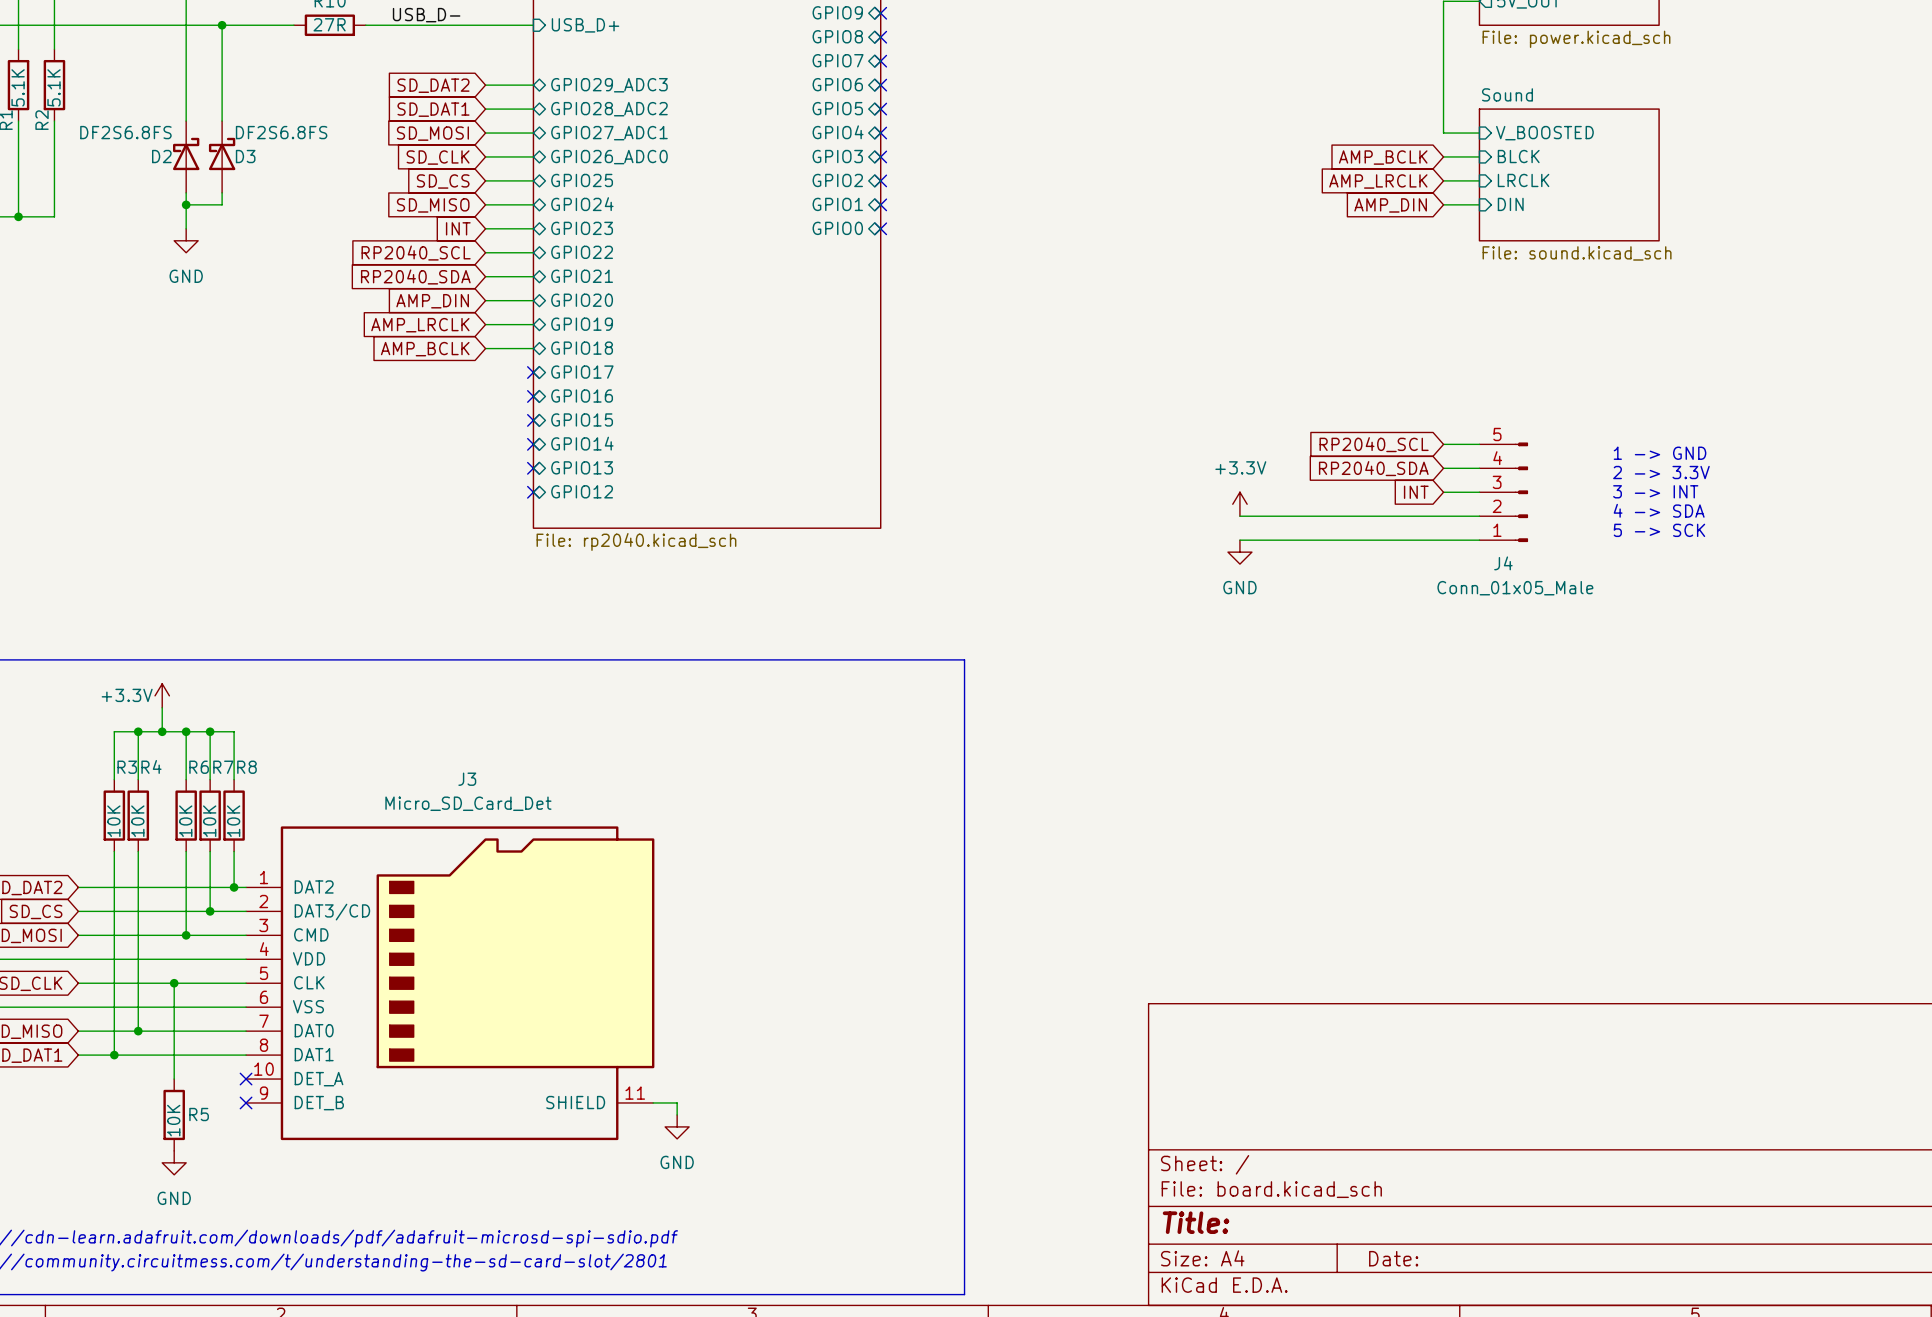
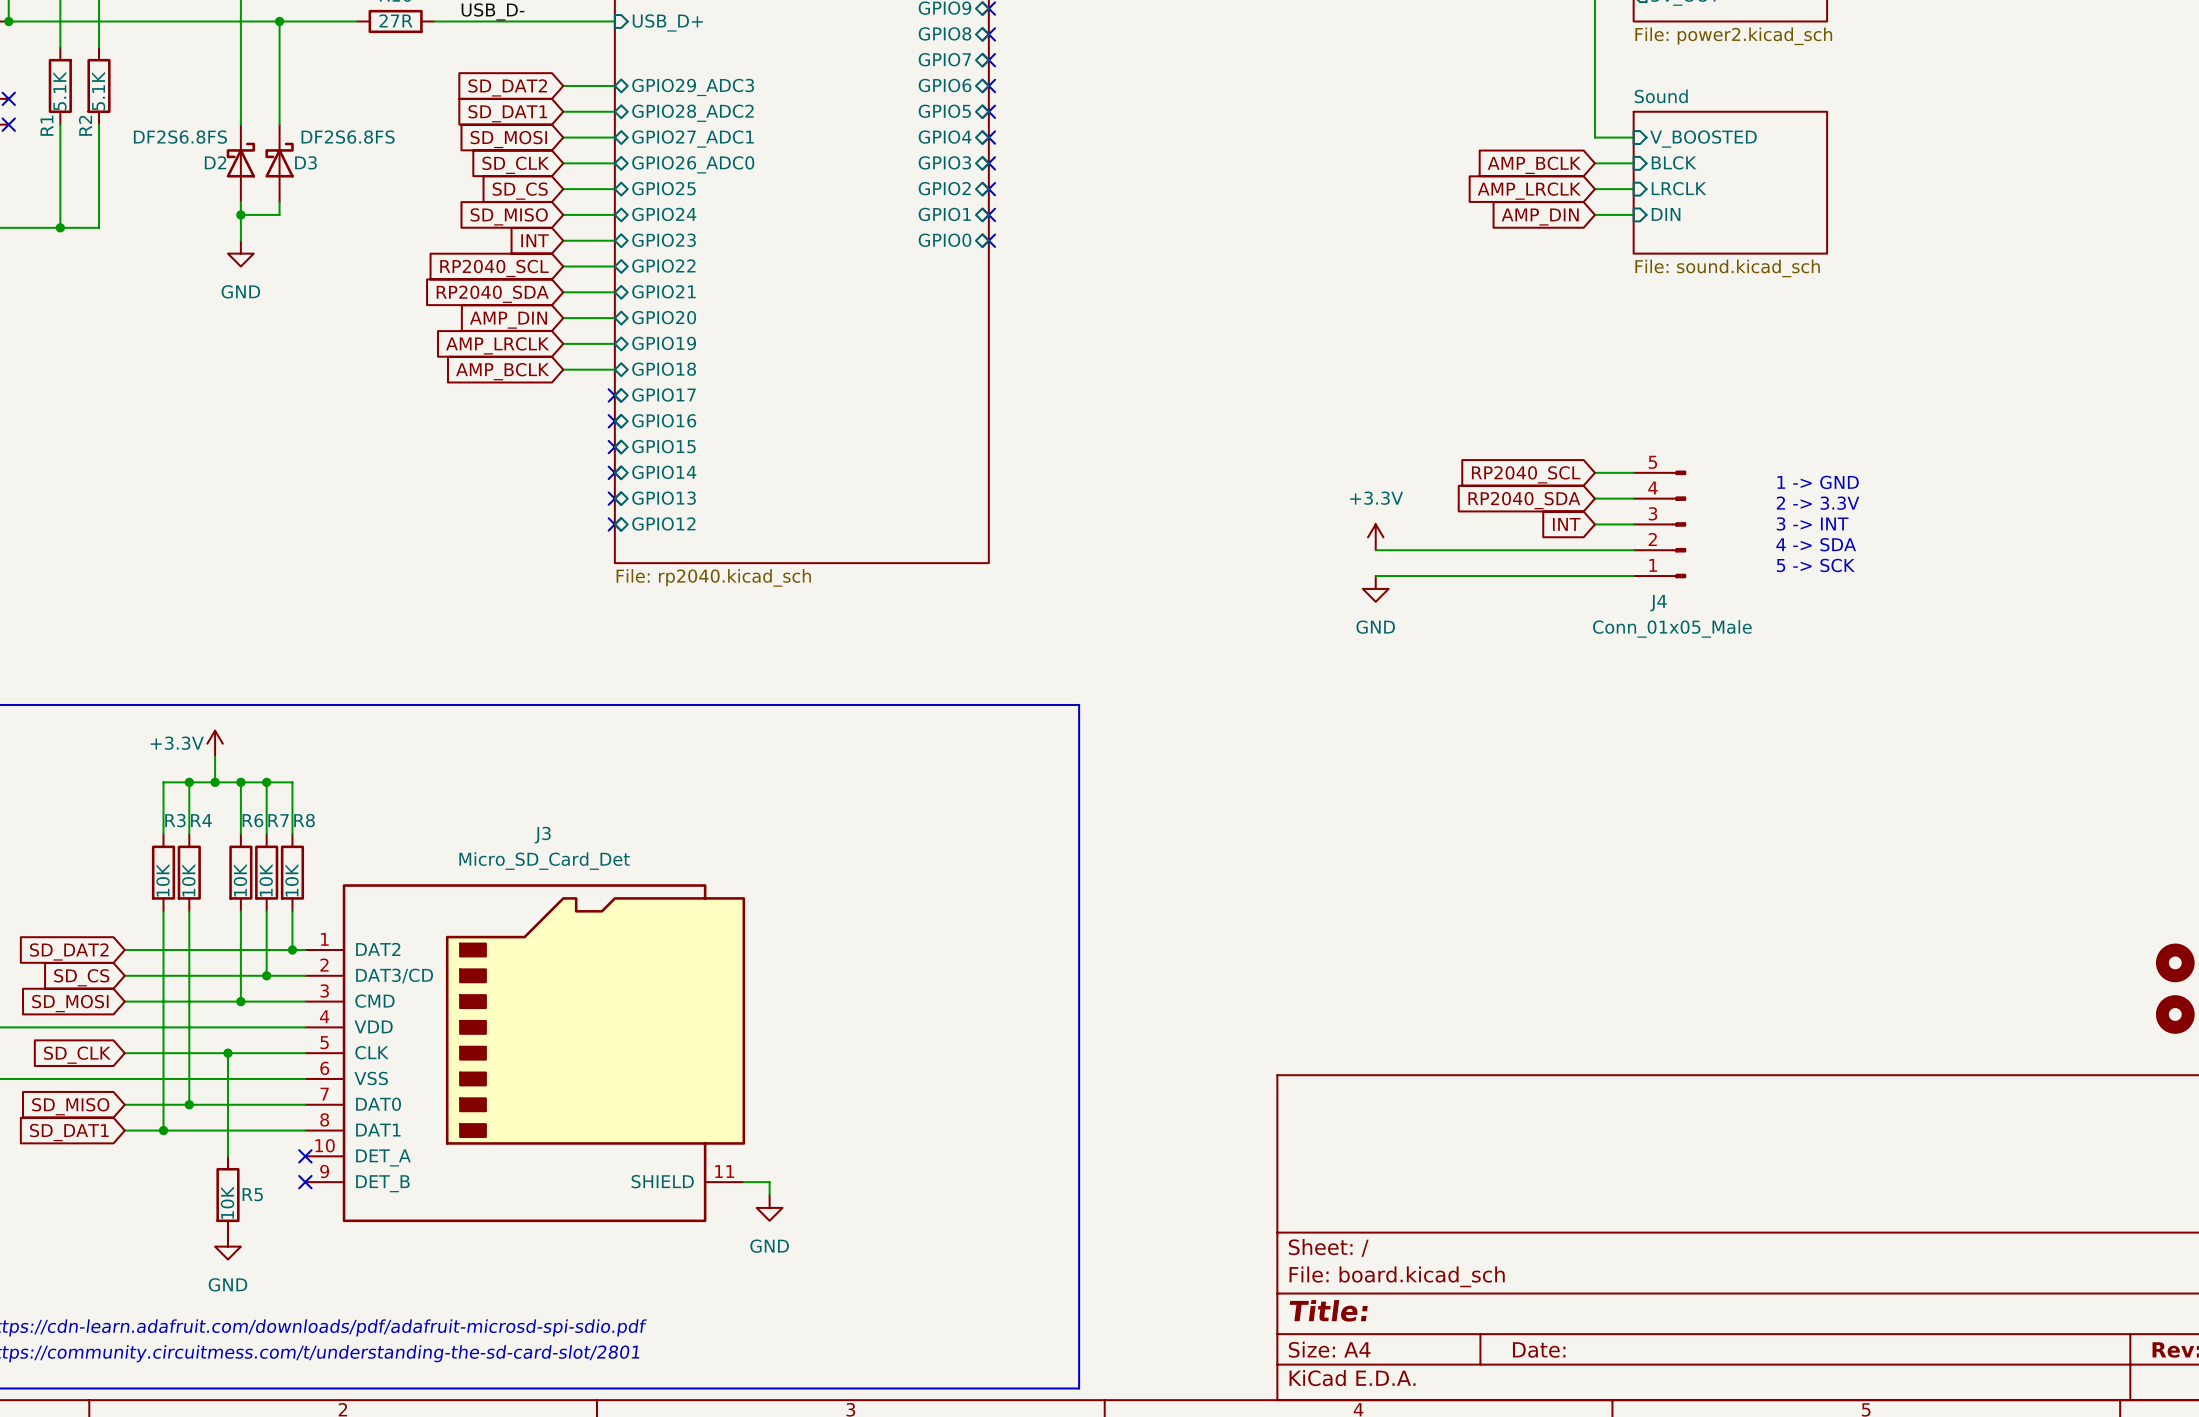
sheet value: File: power.kicad_sch (1576, 39) -> File: power2.kicad_sch (1733, 36)

